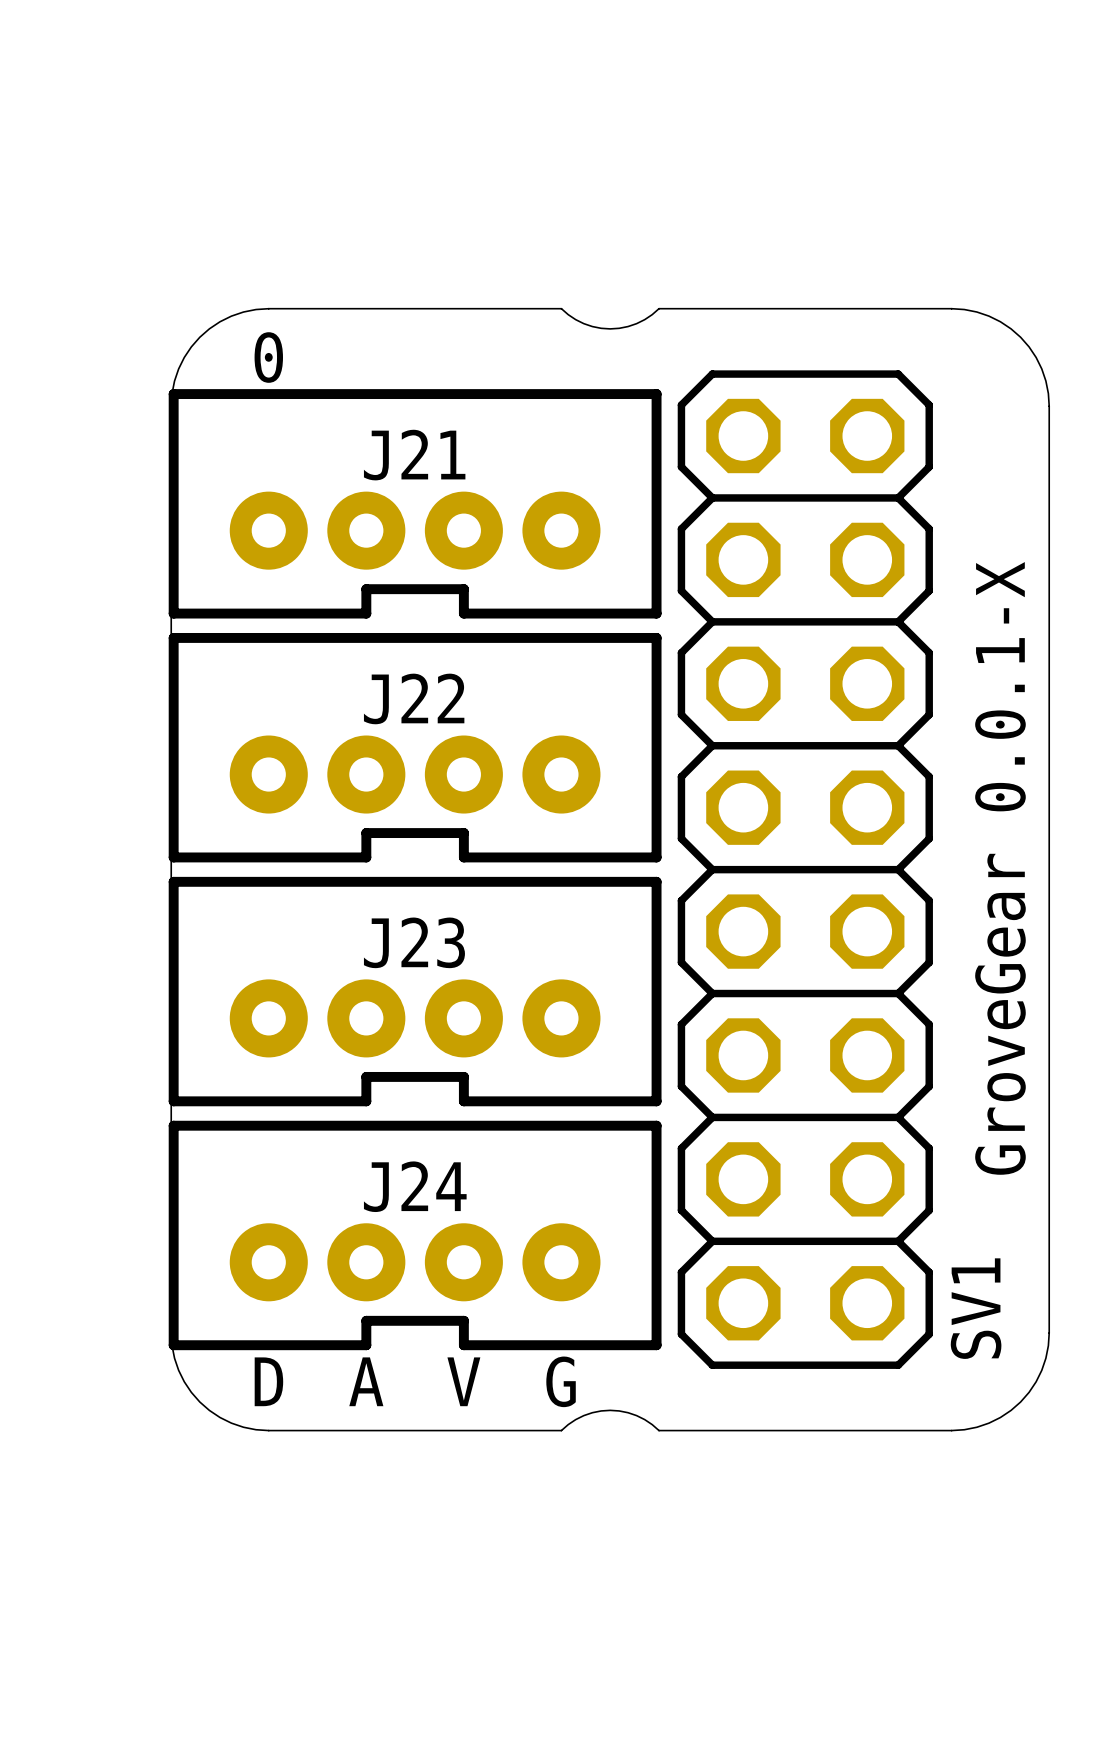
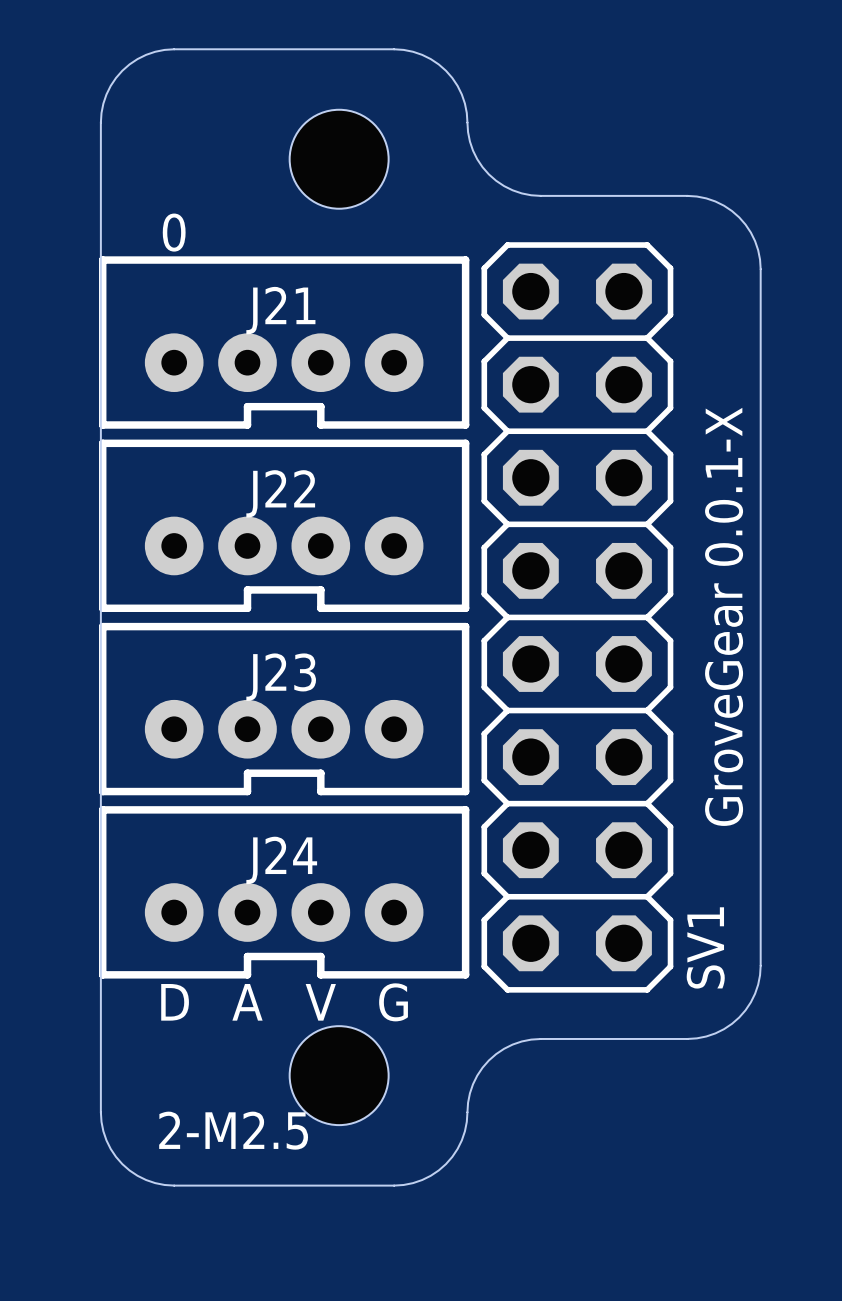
hole: none -> (339, 159)
board edge: (756, 308) (659, 308) (636, 323) (610, 328) (583, 323) (561, 308) (256, 309) (231, 316) (220, 321) (199, 337) (191, 346) (178, 368) (174, 381) (171, 406) -> (540, 195) (512, 190) (496, 180) (482, 167) (469, 141) (464, 103) (457, 85) (445, 70) (422, 54) (394, 49) (164, 49) (137, 59) (122, 70) (110, 85) (103, 103) (100, 122) (100, 269)
board edge: (171, 1333) (174, 1358) (178, 1370) (191, 1392) (199, 1402) (220, 1417) (231, 1423) (256, 1429) (561, 1430) (583, 1415) (610, 1410) (636, 1415) (659, 1430) (756, 1430) -> (100, 965) (100, 1112) (103, 1131) (110, 1148) (122, 1164) (137, 1175) (164, 1184) (394, 1185) (422, 1180) (445, 1164) (457, 1148) (464, 1131) (469, 1093) (482, 1067) (496, 1054) (512, 1044) (540, 1038)
hole: none -> (339, 1075)
text: none -> 2-M2.5 (233, 1130)

